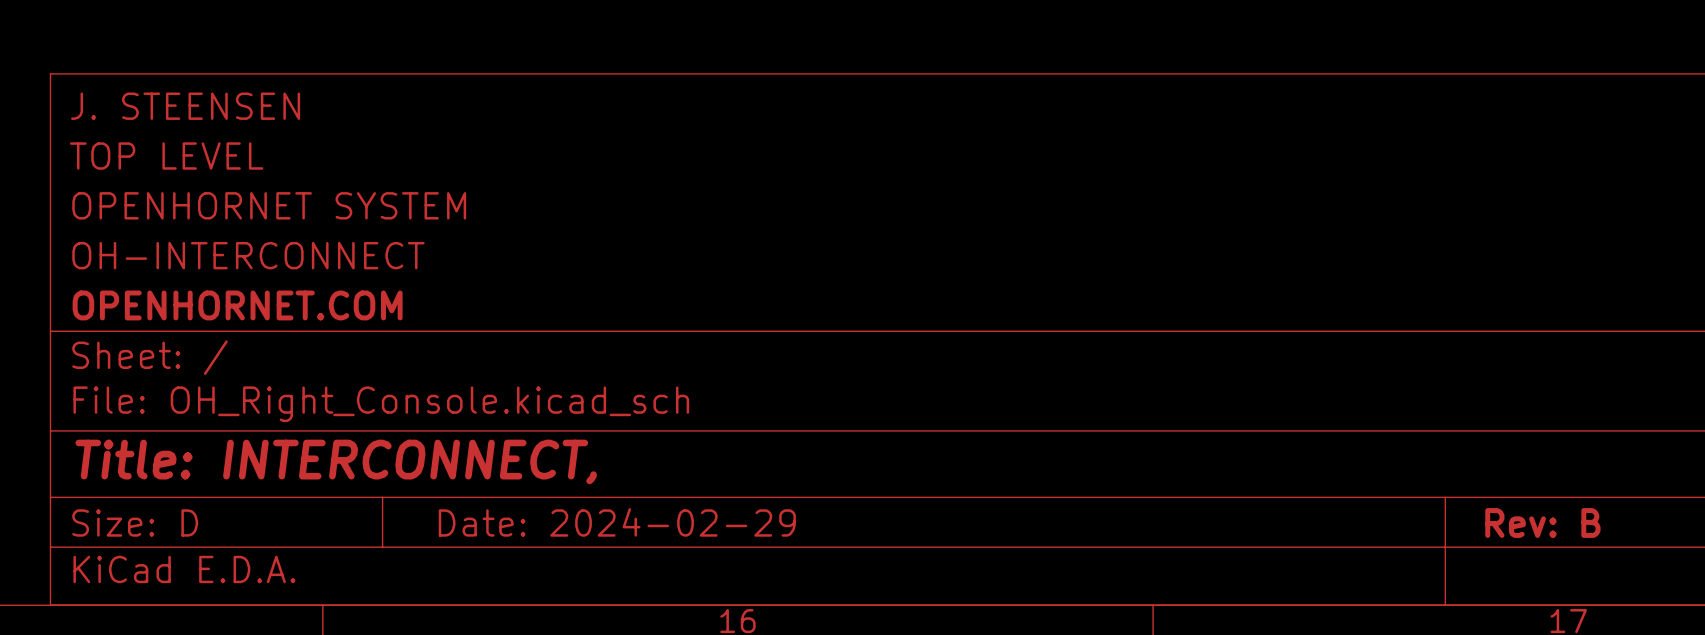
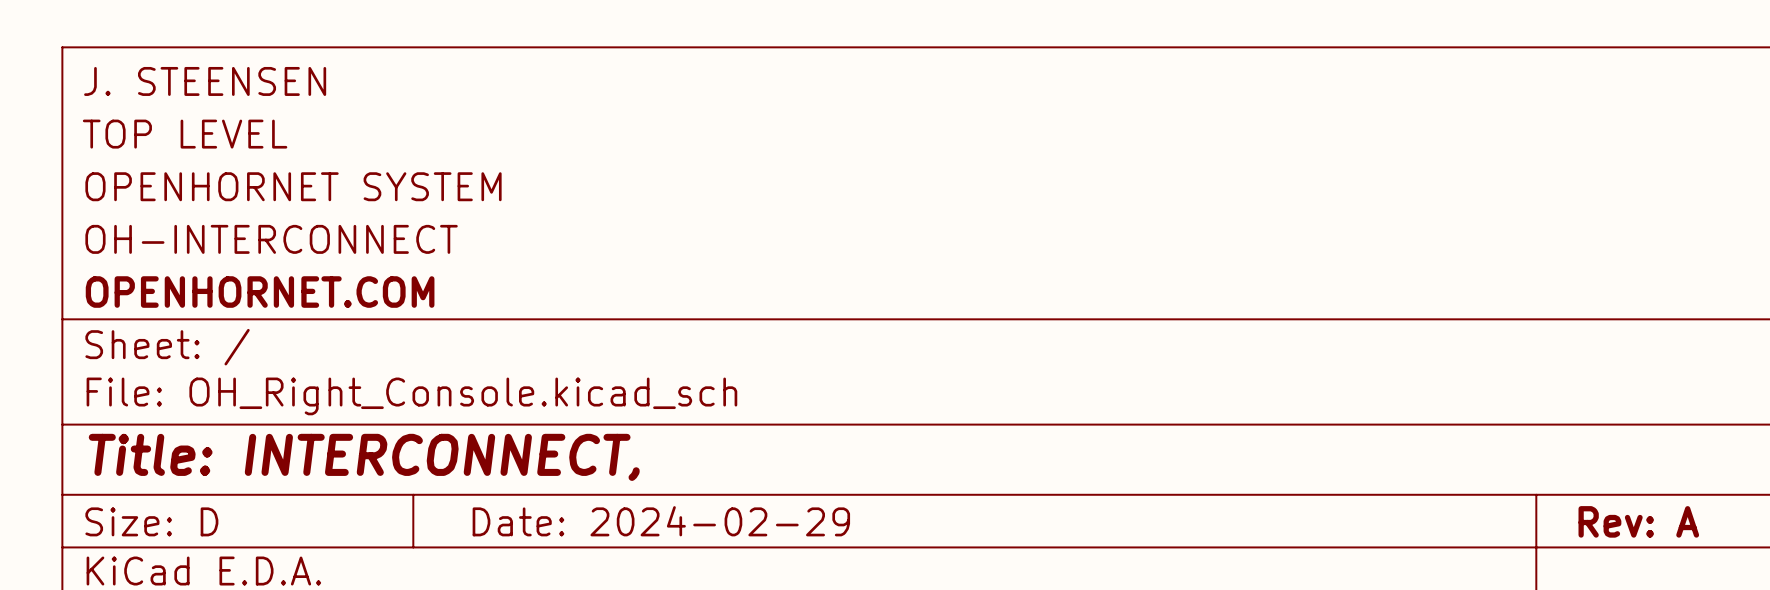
title block: Rev: B (1542, 522) -> Rev: A (1638, 521)

